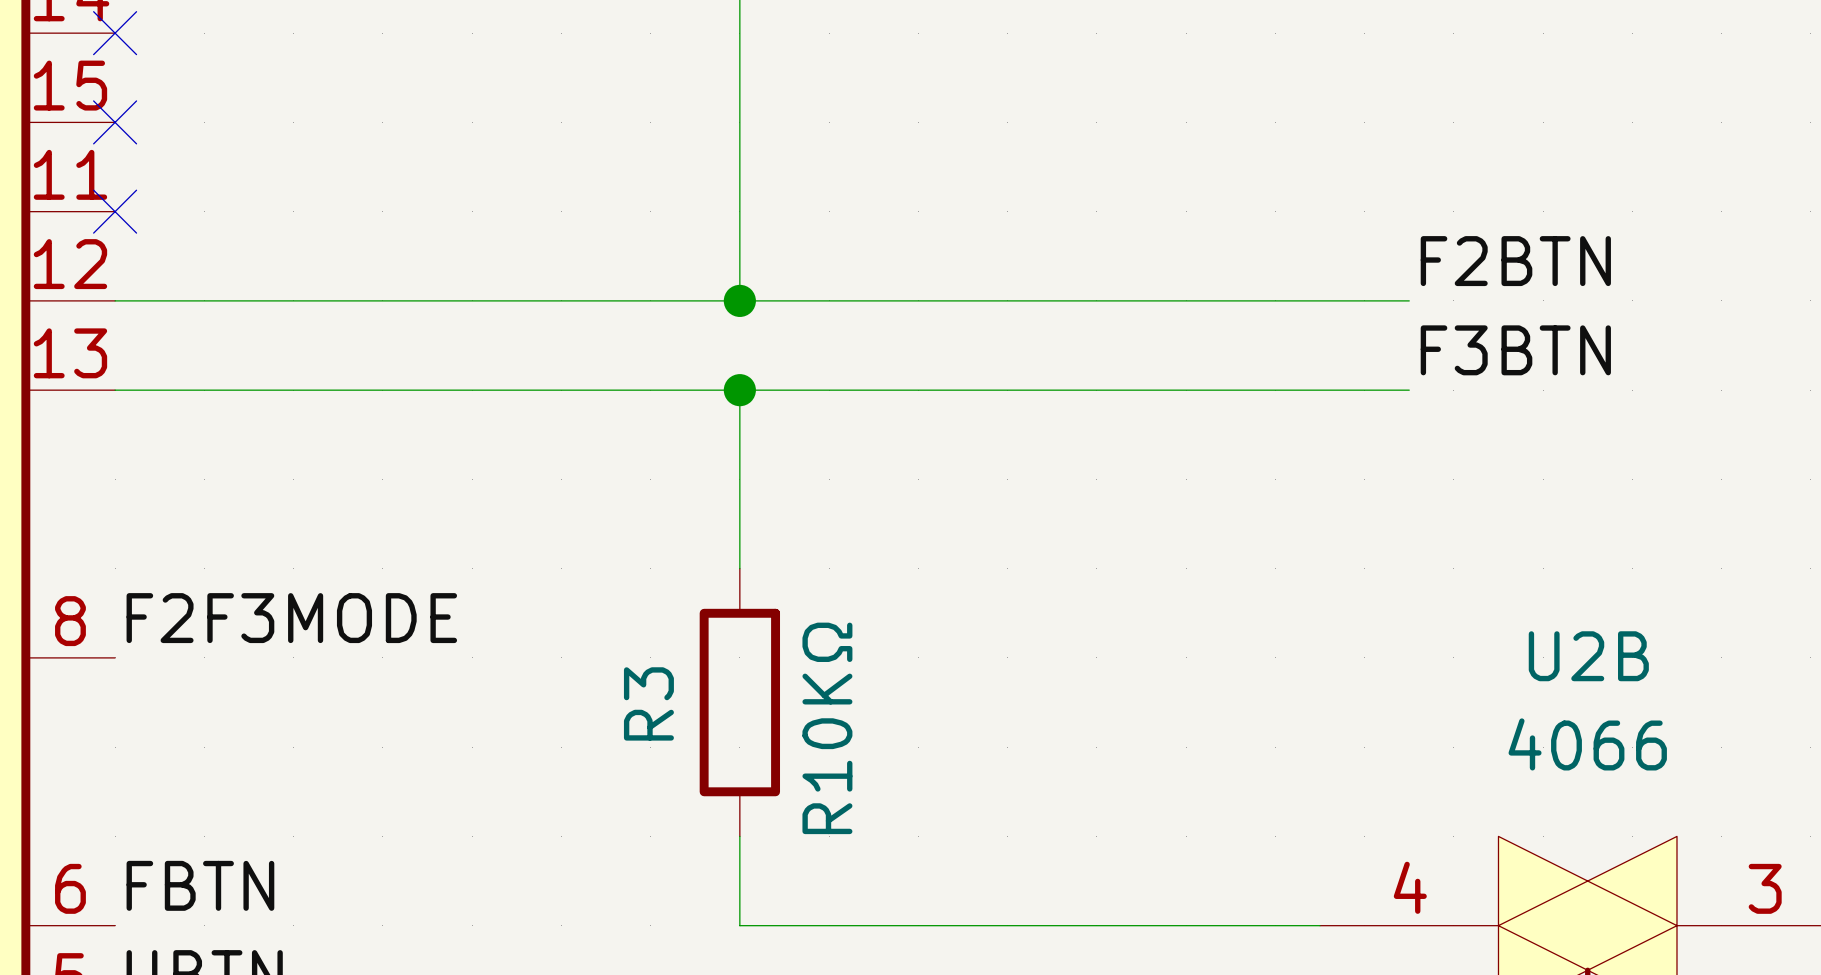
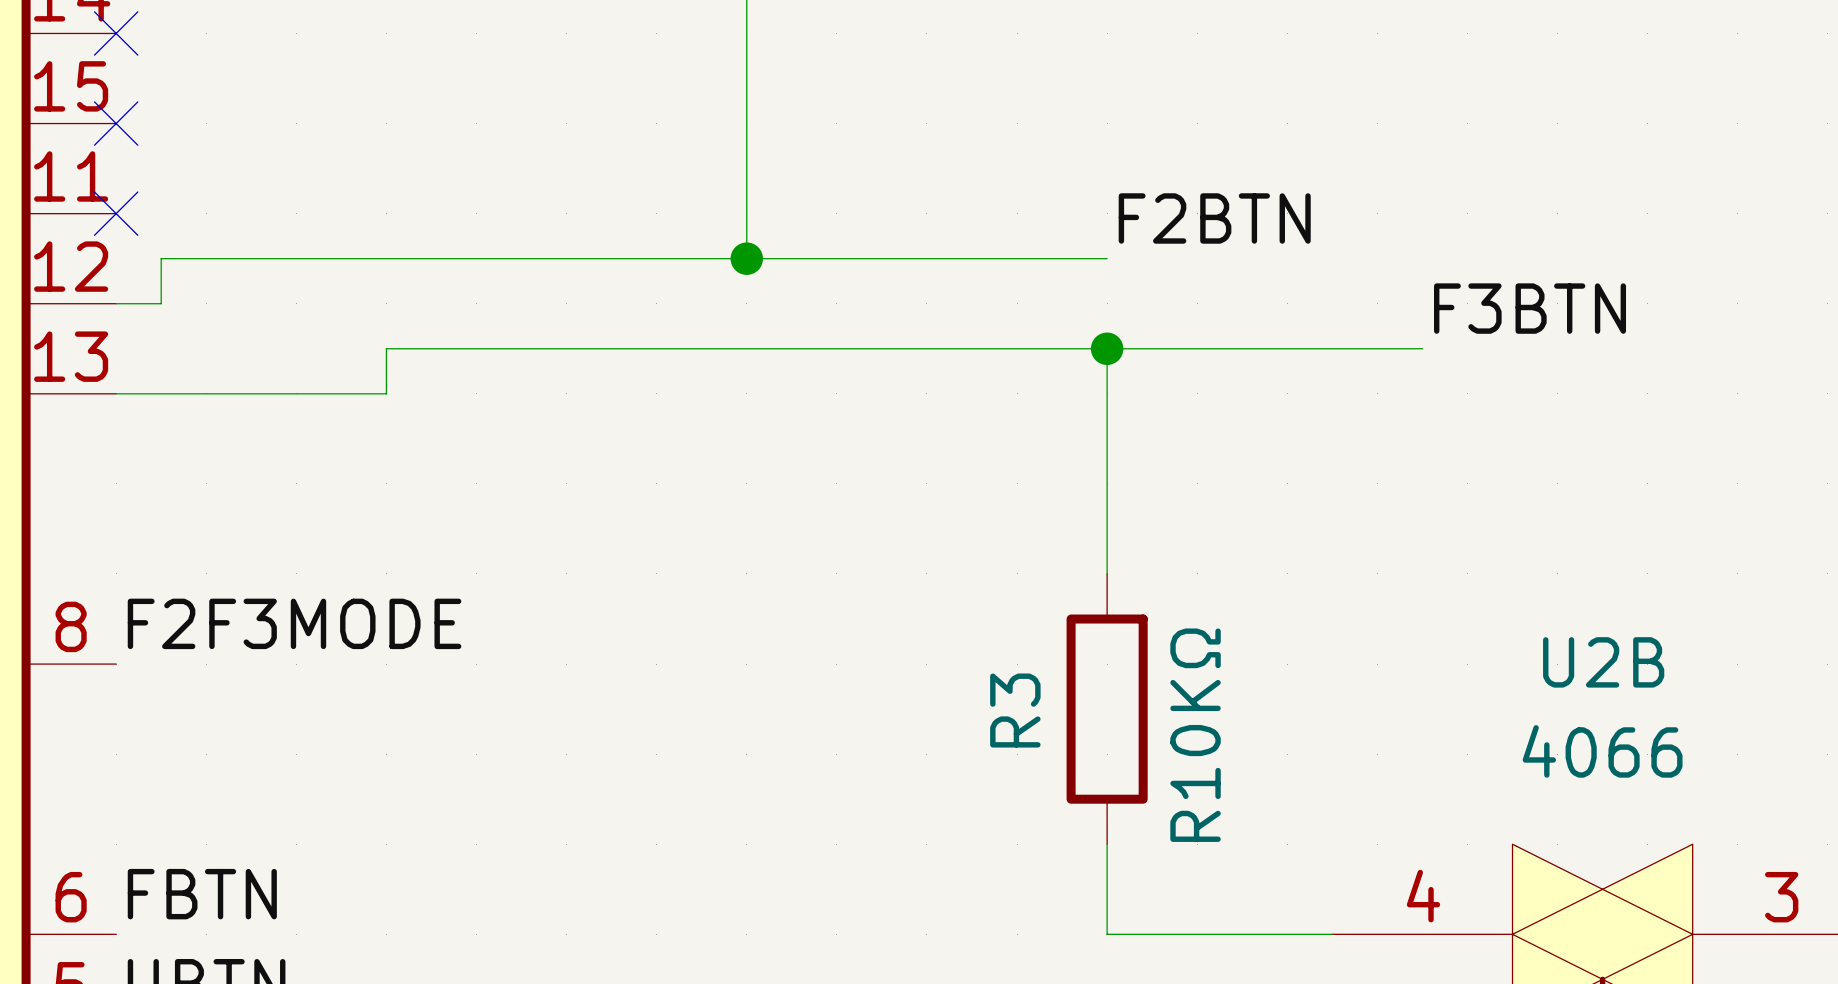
wire: (739, 256) (739, 300) -> none
label position: F2BTN (1515, 261) -> F2BTN (1214, 218)
wire: (159, 300) (1409, 300) -> (161, 303) (161, 258) (1107, 258)
junction position: (739, 300) -> (746, 258)
wire: none -> (1107, 348) (1107, 573)
junction: none -> (1107, 348)
label position: F3BTN (1515, 350) -> F3BTN (1530, 308)
wire: (382, 390) (1409, 390) -> (386, 393) (386, 348) (1422, 348)
wire: (739, 390) (739, 568) -> none
junction: (739, 390) -> none
R3 position: (739, 702) -> (1107, 709)
wire: (739, 836) (739, 925) (1096, 925) -> (1107, 844) (1107, 934)

